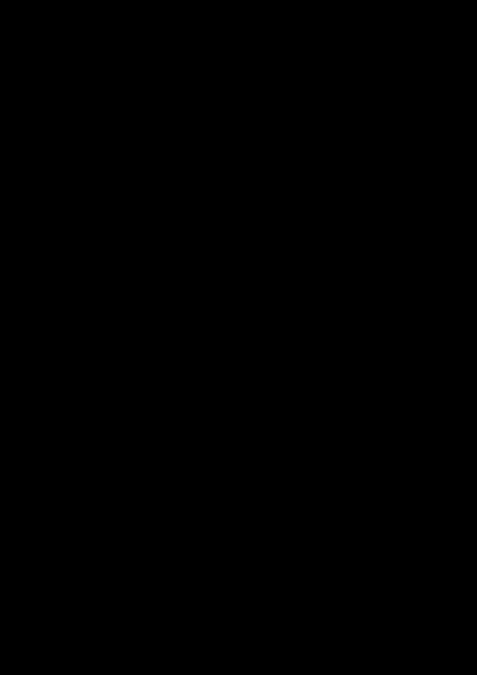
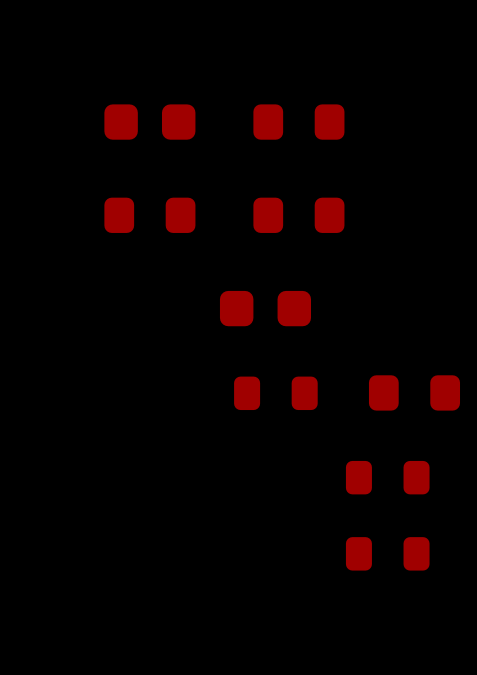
part: none -> (149, 122)
part: none -> (298, 122)
part: none -> (149, 215)
part: none -> (298, 215)
part: none -> (265, 308)
part: none -> (414, 392)
part: none -> (275, 393)
part: none -> (387, 477)
part: none -> (387, 553)

